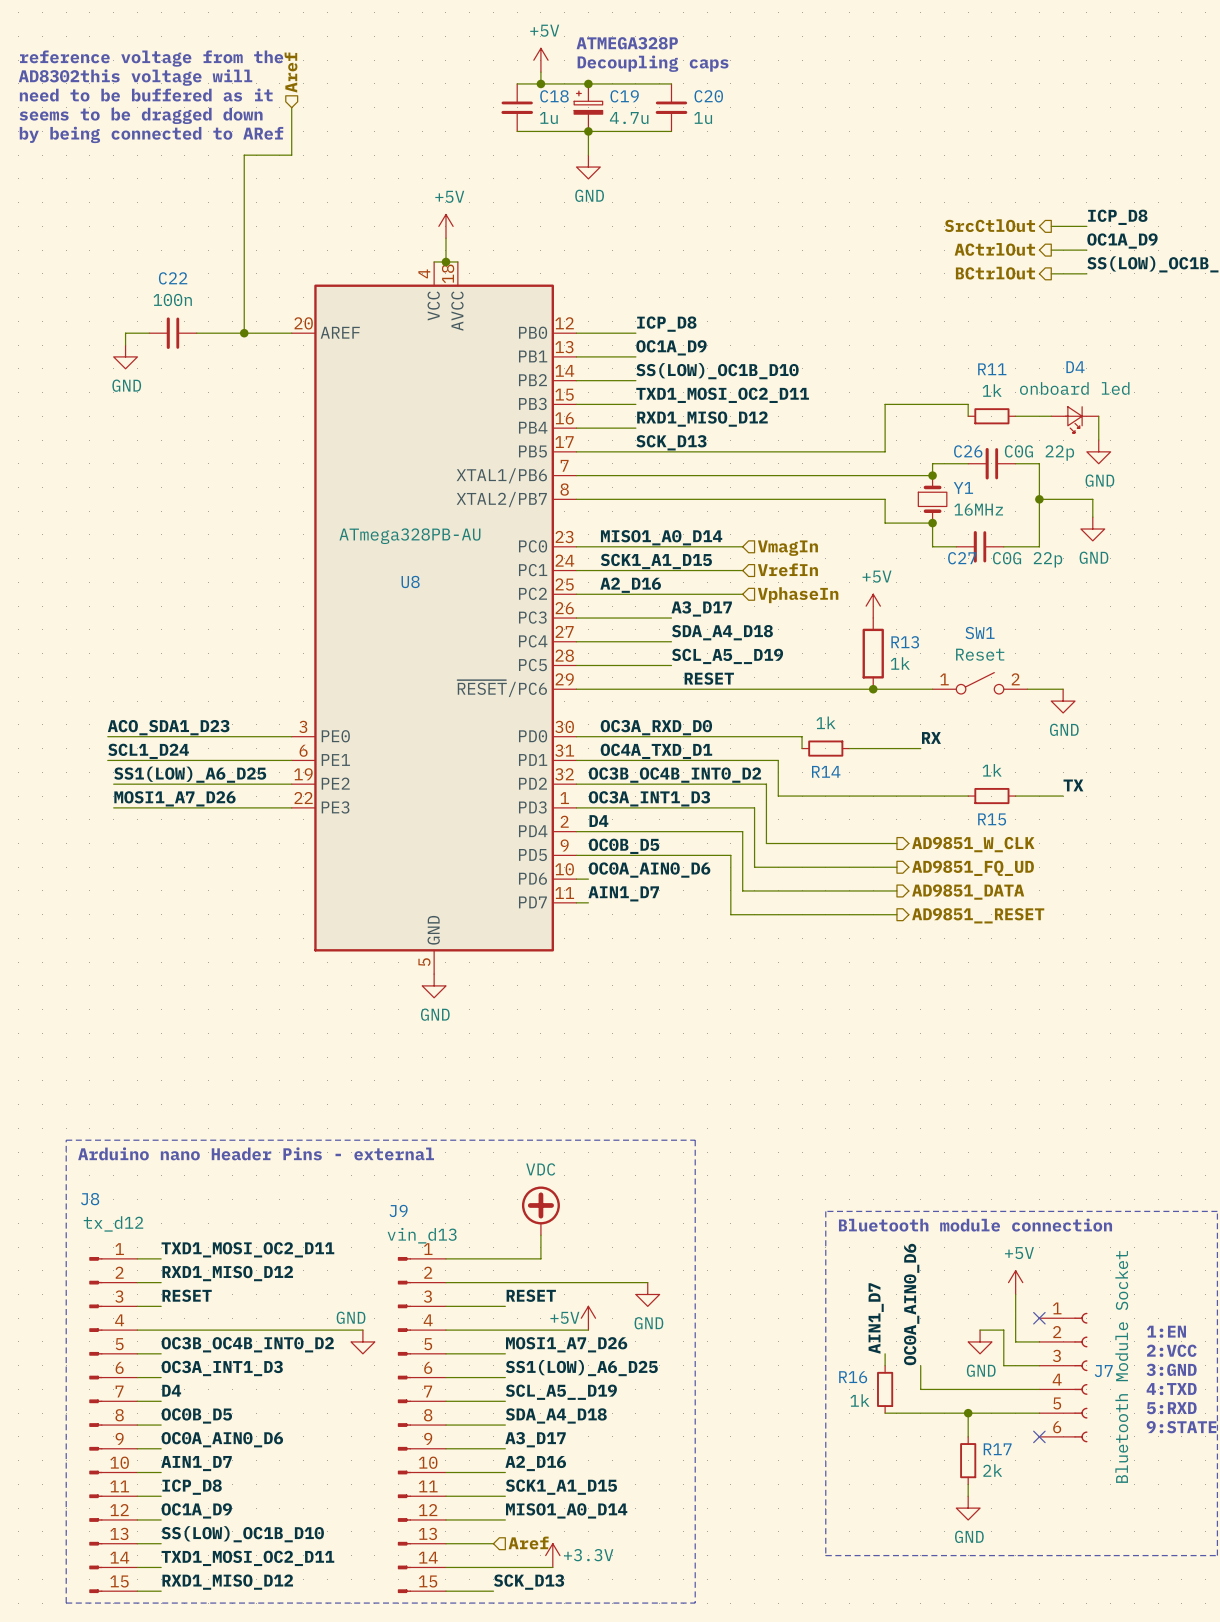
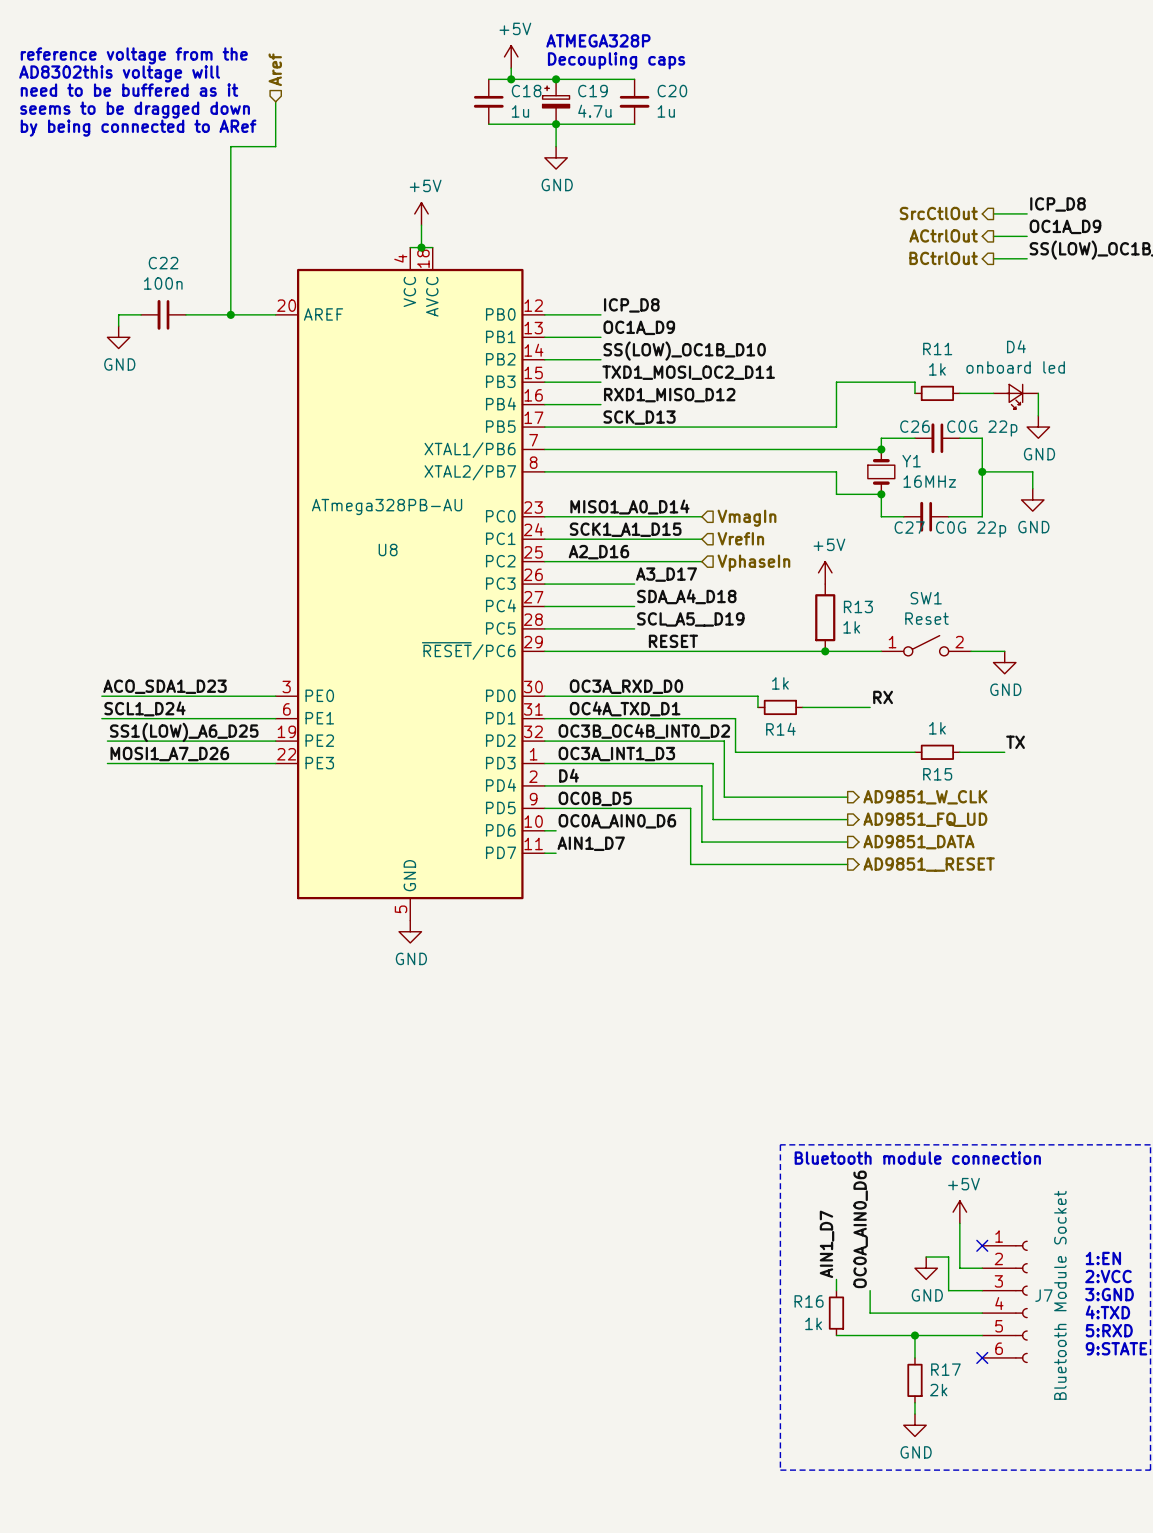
line: (66, 1140) (66, 1603) (695, 1603) (695, 1140) (66, 1140) -> none
text: Arduino nano Header Pins - external (256, 1153) -> none
power symbol: VDC (540, 1210) -> none
wire: (540, 1235) (540, 1258) (445, 1258) -> none
label: TXD1_MOSI_OC2_D11 (247, 1249) -> none
wire: (137, 1258) (161, 1258) -> none
label: RXD1_MISO_D12 (227, 1273) -> none
wire: (137, 1282) (161, 1282) -> none
wire: (445, 1282) (647, 1282) -> none
power symbol: GND (647, 1294) -> none
label: RESET (187, 1295) -> none
label: RESET (531, 1295) -> none
wire: (137, 1306) (161, 1306) -> none
wire: (445, 1306) (505, 1306) -> none
power symbol: +5V (588, 1318) -> none
wire: (137, 1330) (362, 1330) -> none
wire: (445, 1330) (588, 1330) -> none
power symbol: GND (362, 1341) -> none
label: OC3B_OC4B_INT0_D2 (247, 1344) -> none
label: MOSI1_A7_D26 (566, 1344) -> none
wire: (137, 1353) (161, 1353) -> none
wire: (445, 1353) (505, 1353) -> none
label: OC3A_INT1_D3 (222, 1368) -> none
label: SS1(LOW)_A6_D25 (581, 1368) -> none
wire: (137, 1377) (161, 1377) -> none
wire: (445, 1377) (505, 1377) -> none
label: D4 (171, 1390) -> none
label: SCL_A5__D19 (561, 1392) -> none
wire: (137, 1401) (161, 1401) -> none
wire: (445, 1401) (505, 1401) -> none
label: OC0B_D5 (196, 1415) -> none
label: SDA_A4_D18 (556, 1415) -> none
J8: tx_d12 (113, 1425) -> none
wire: (137, 1425) (161, 1425) -> none
J9: vin_d13 (421, 1425) -> none
wire: (445, 1425) (505, 1425) -> none
label: OC0A_AIN0_D6 (222, 1439) -> none
label: A3_D17 (535, 1439) -> none
wire: (137, 1448) (161, 1448) -> none
wire: (445, 1448) (505, 1448) -> none
label: AIN1_D7 (196, 1463) -> none
label: A2_D16 (535, 1463) -> none
wire: (137, 1472) (161, 1472) -> none
wire: (445, 1472) (505, 1472) -> none
label: ICP_D8 (192, 1487) -> none
label: SCK1_A1_D15 (561, 1487) -> none
wire: (137, 1496) (161, 1496) -> none
wire: (445, 1496) (505, 1496) -> none
label: OC1A_D9 (196, 1510) -> none
label: MISO1_A0_D14 (566, 1510) -> none
wire: (137, 1519) (161, 1519) -> none
wire: (445, 1519) (505, 1519) -> none
label: SS(LOW)_OC1B_D10 (242, 1534) -> none
wire: (137, 1543) (161, 1543) -> none
wire: (445, 1543) (493, 1543) -> none
hierarchical label: Aref (528, 1543) -> none
power symbol: +3.3V (552, 1555) -> none
label: TXD1_MOSI_OC2_D11 (247, 1558) -> none
wire: (137, 1567) (161, 1567) -> none
wire: (445, 1567) (552, 1567) -> none
label: RXD1_MISO_D12 (227, 1582) -> none
label: SCK_D13 (529, 1582) -> none
wire: (137, 1591) (161, 1591) -> none
wire: (445, 1591) (493, 1591) -> none

